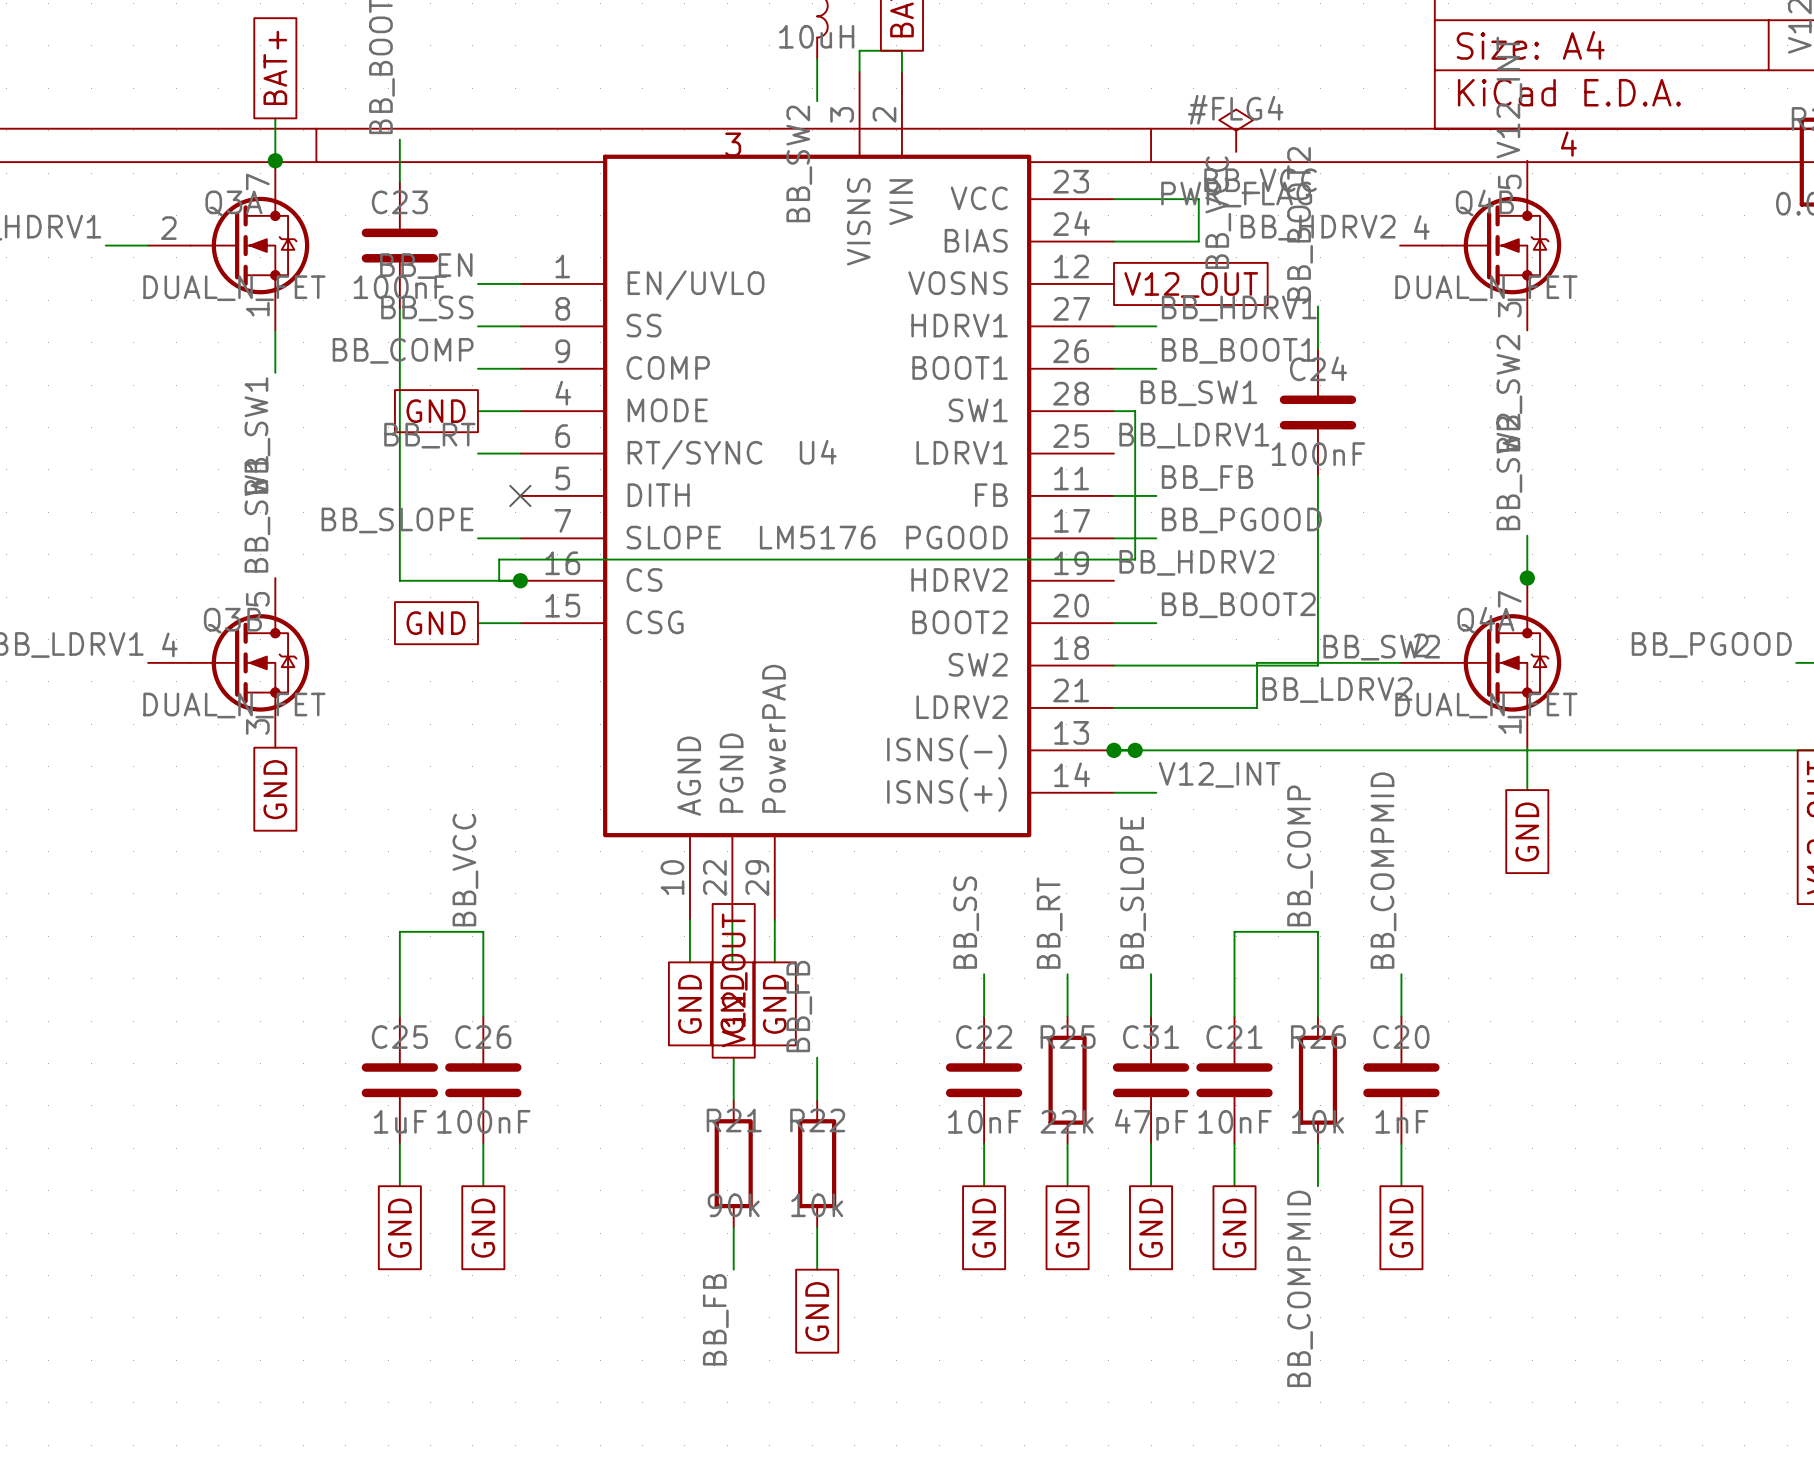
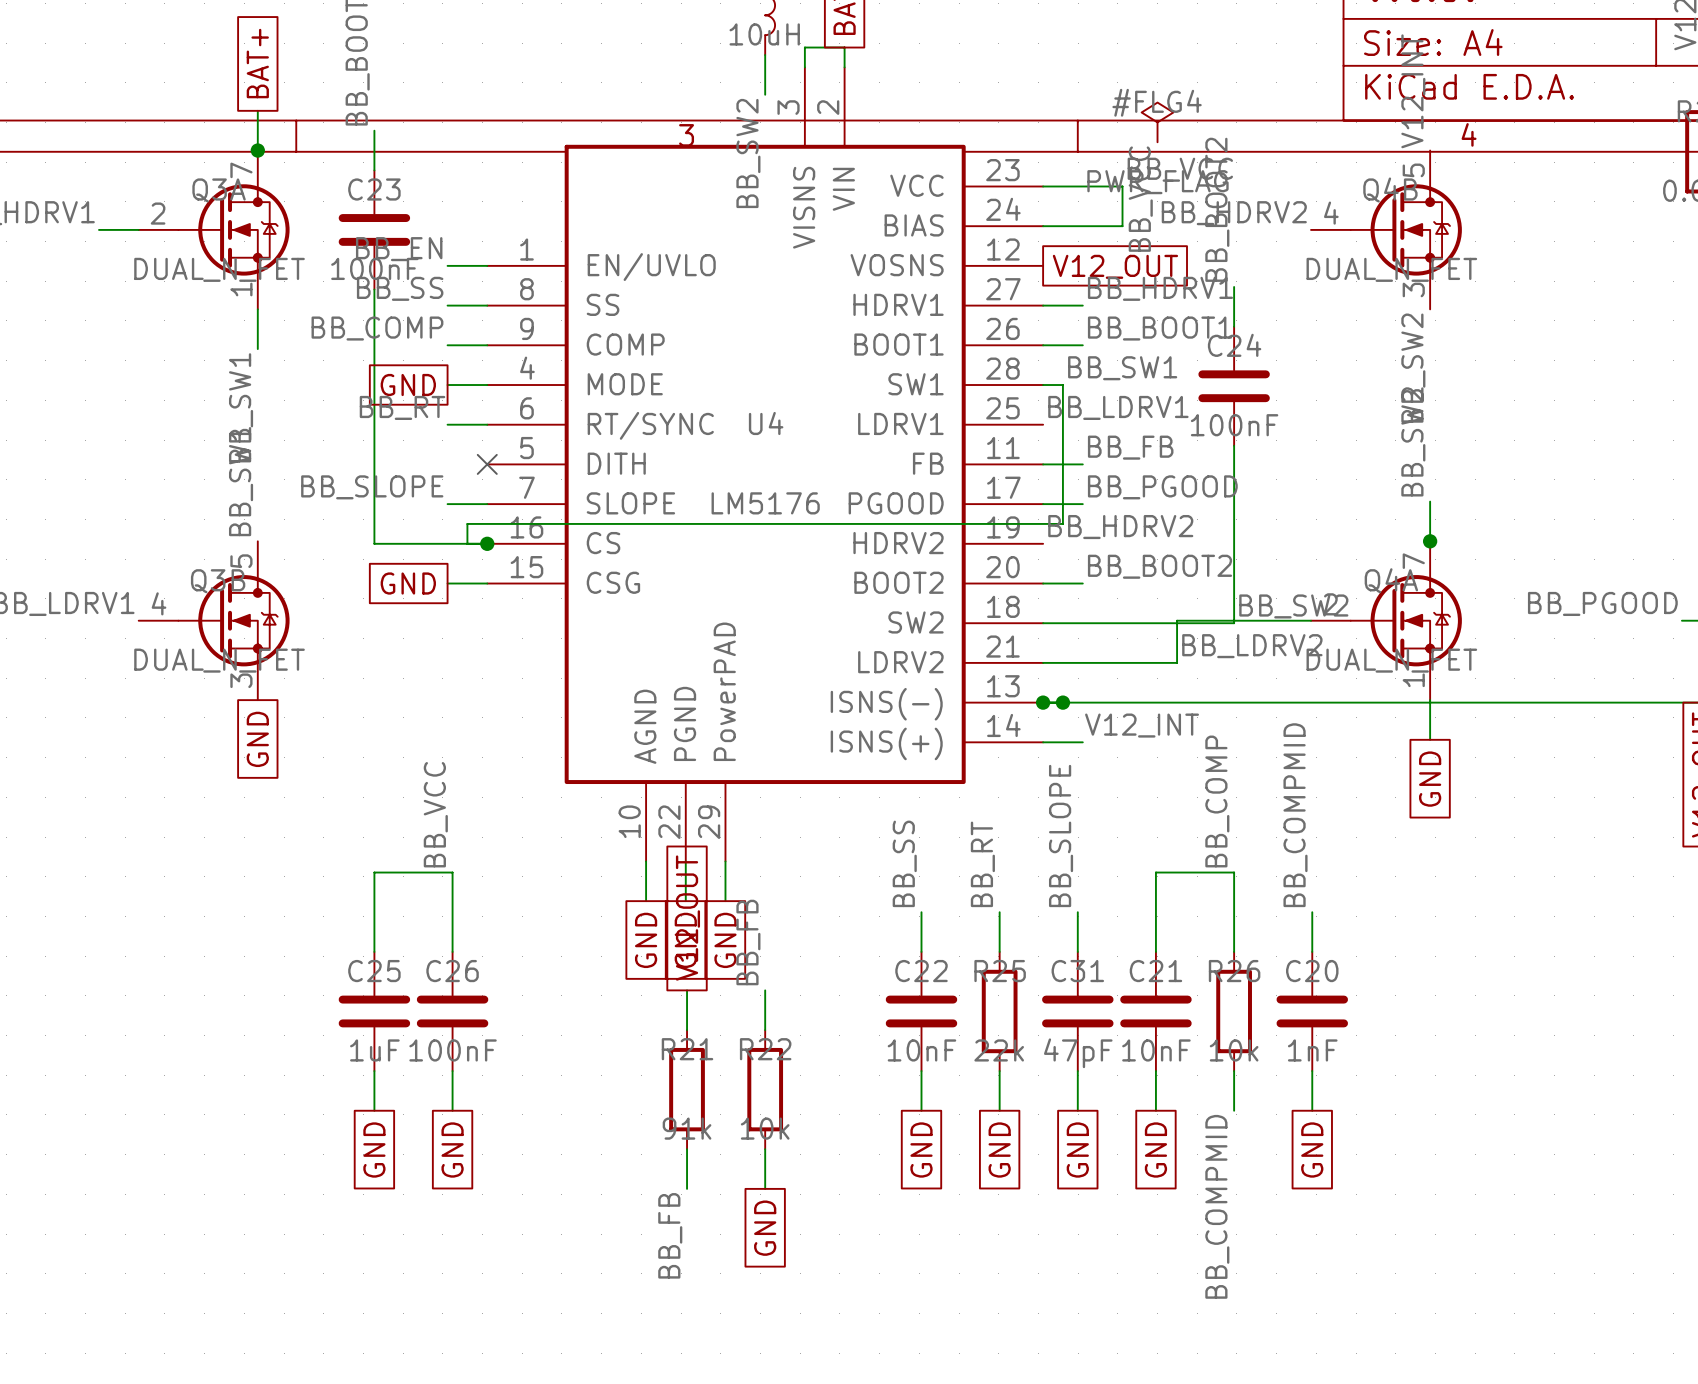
R21 value: 90k (733, 1205) -> 91k (687, 1128)

